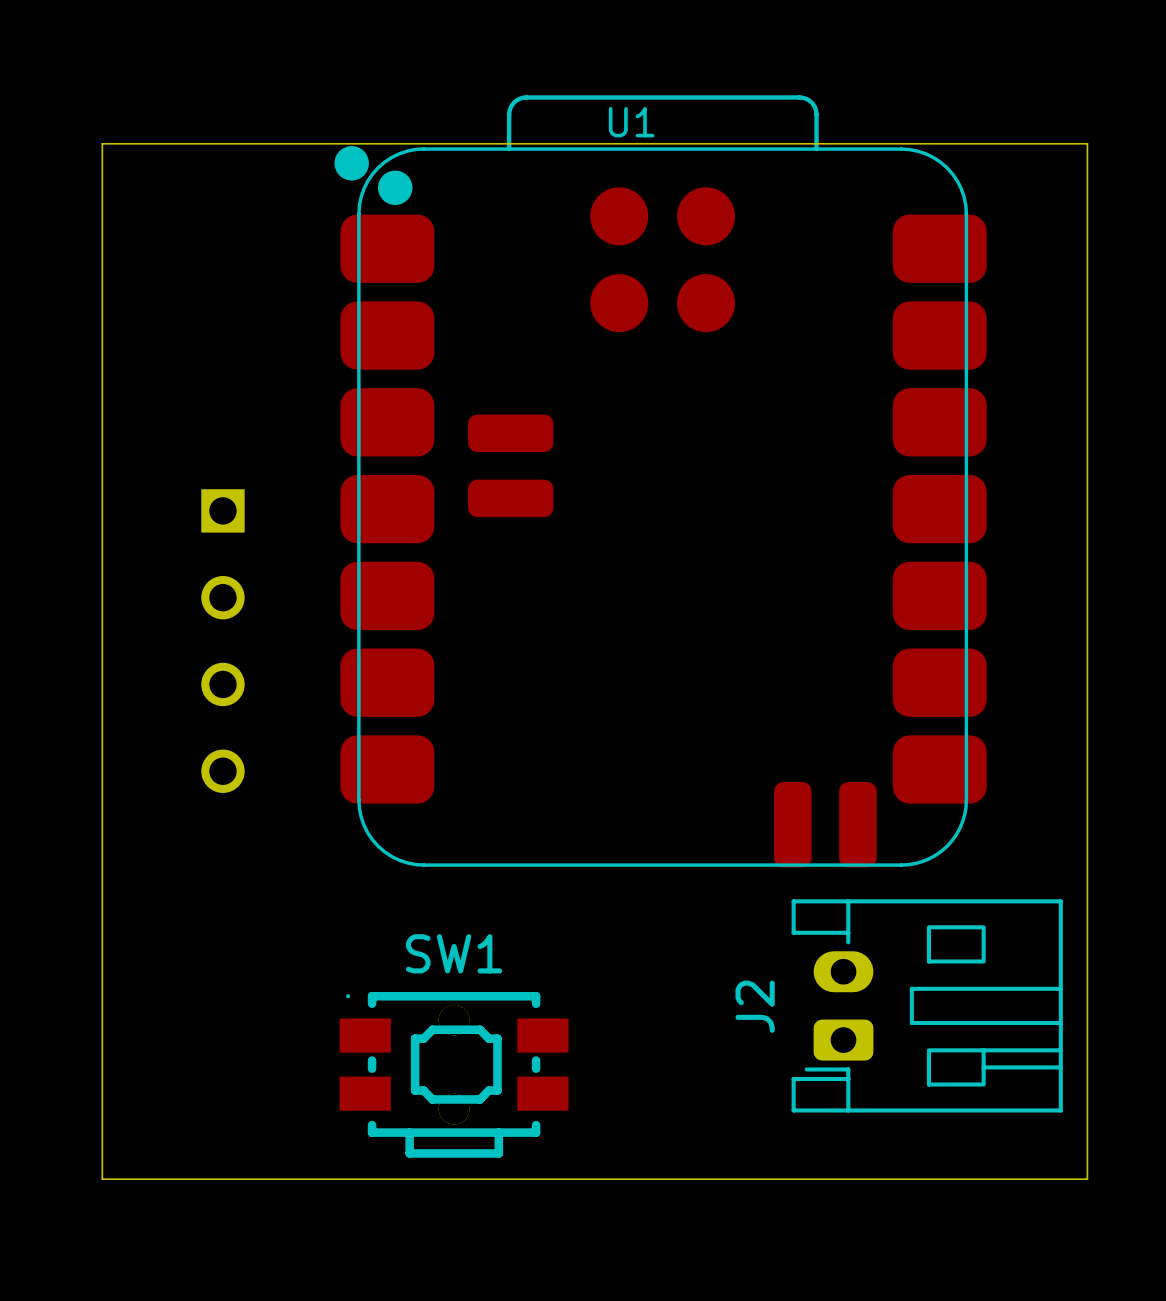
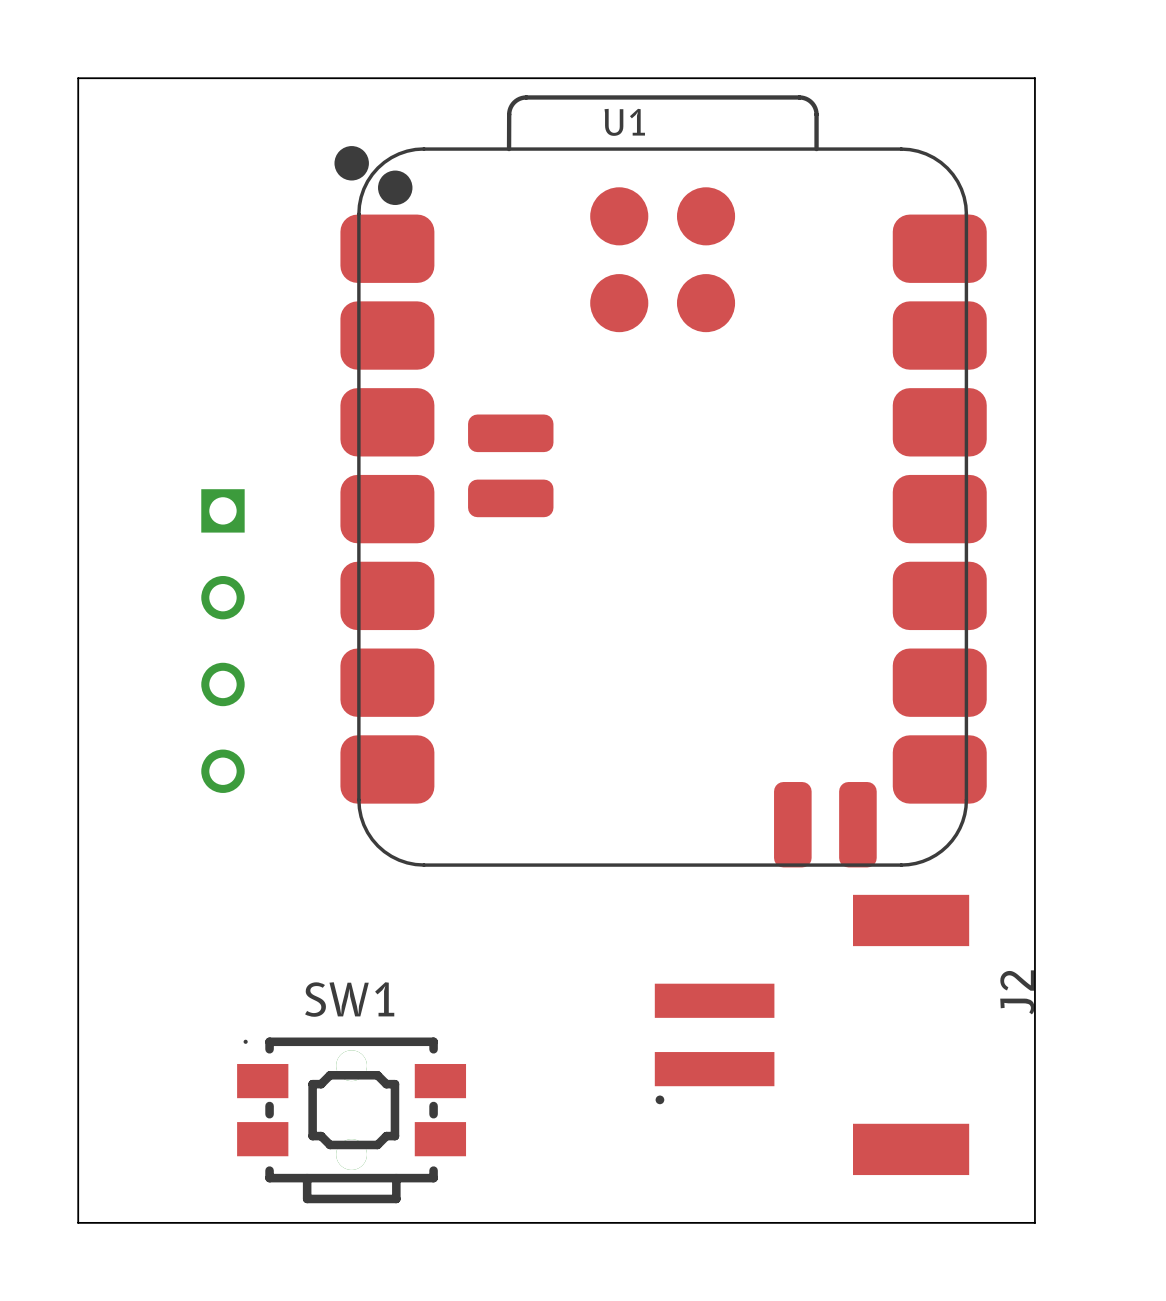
board edge: (102, 143) (1087, 143) (1087, 1179) (102, 1179) (102, 143) -> (78, 78) (78, 1222) (1034, 1222) (1034, 78) (78, 78)
J2 footprint: [791, 899, 1063, 1113] -> [654, 894, 970, 1176]
J2 name position: J2 (755, 1006) -> J2 (1017, 992)
SW1 position: (454, 1074) -> (351, 1120)

